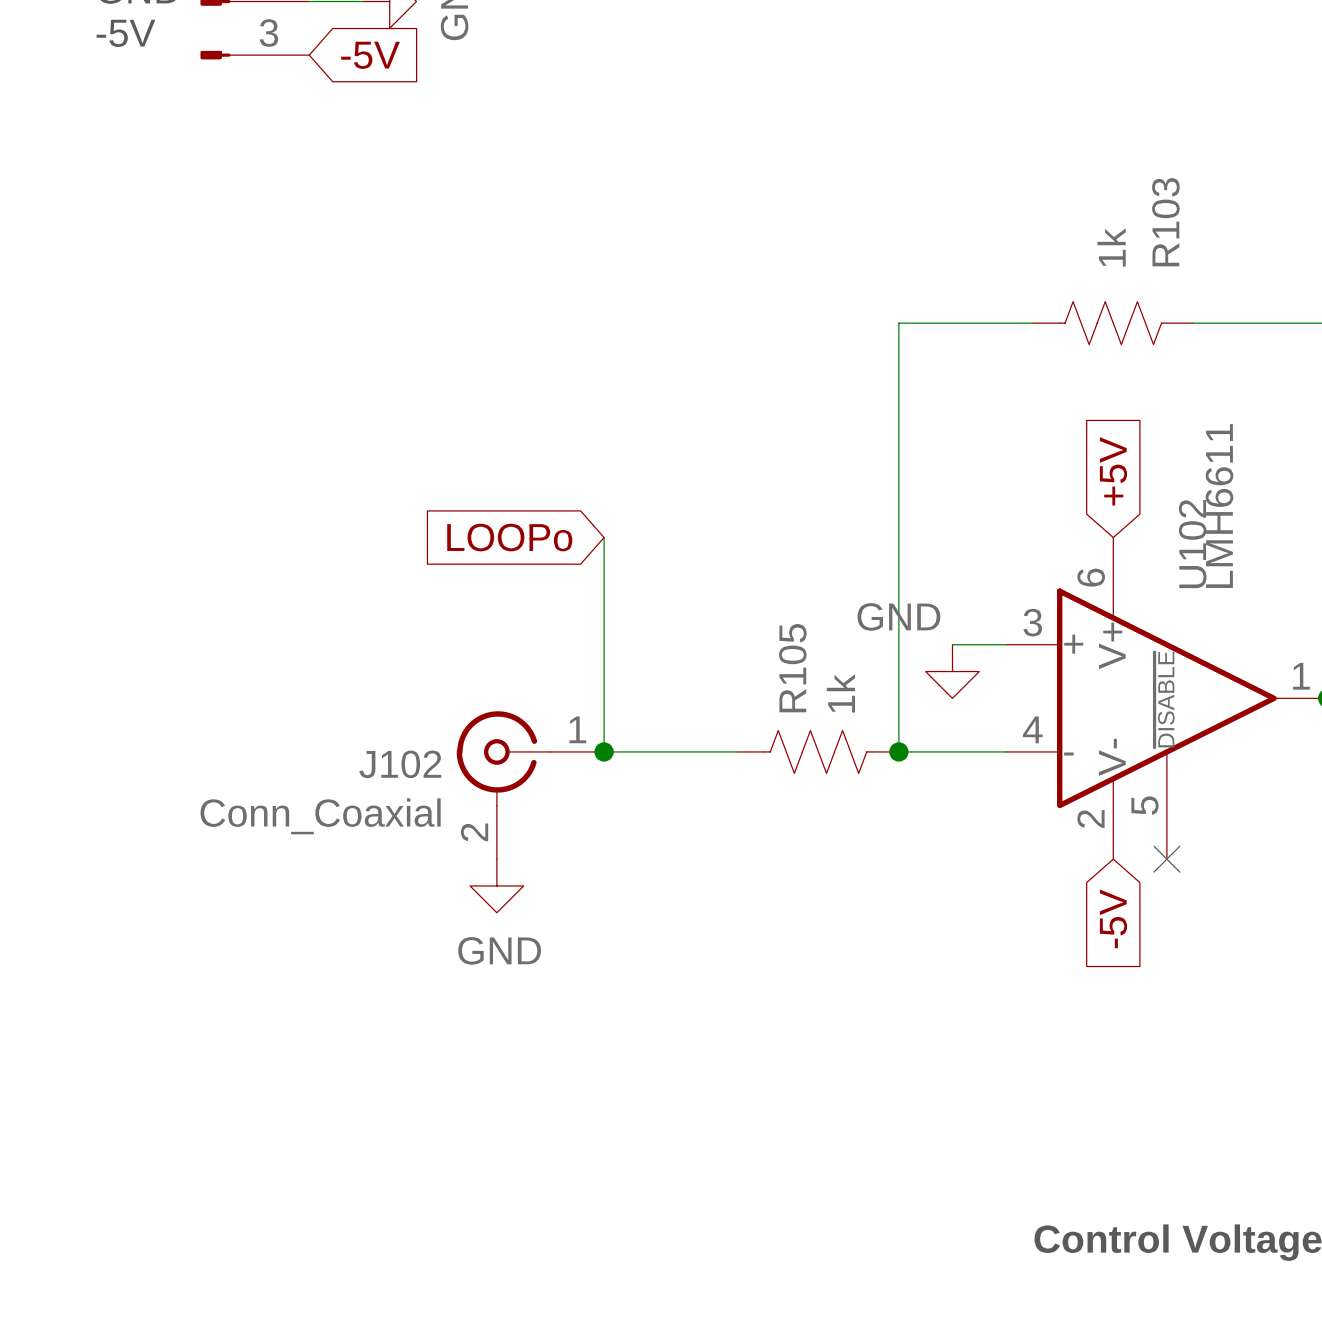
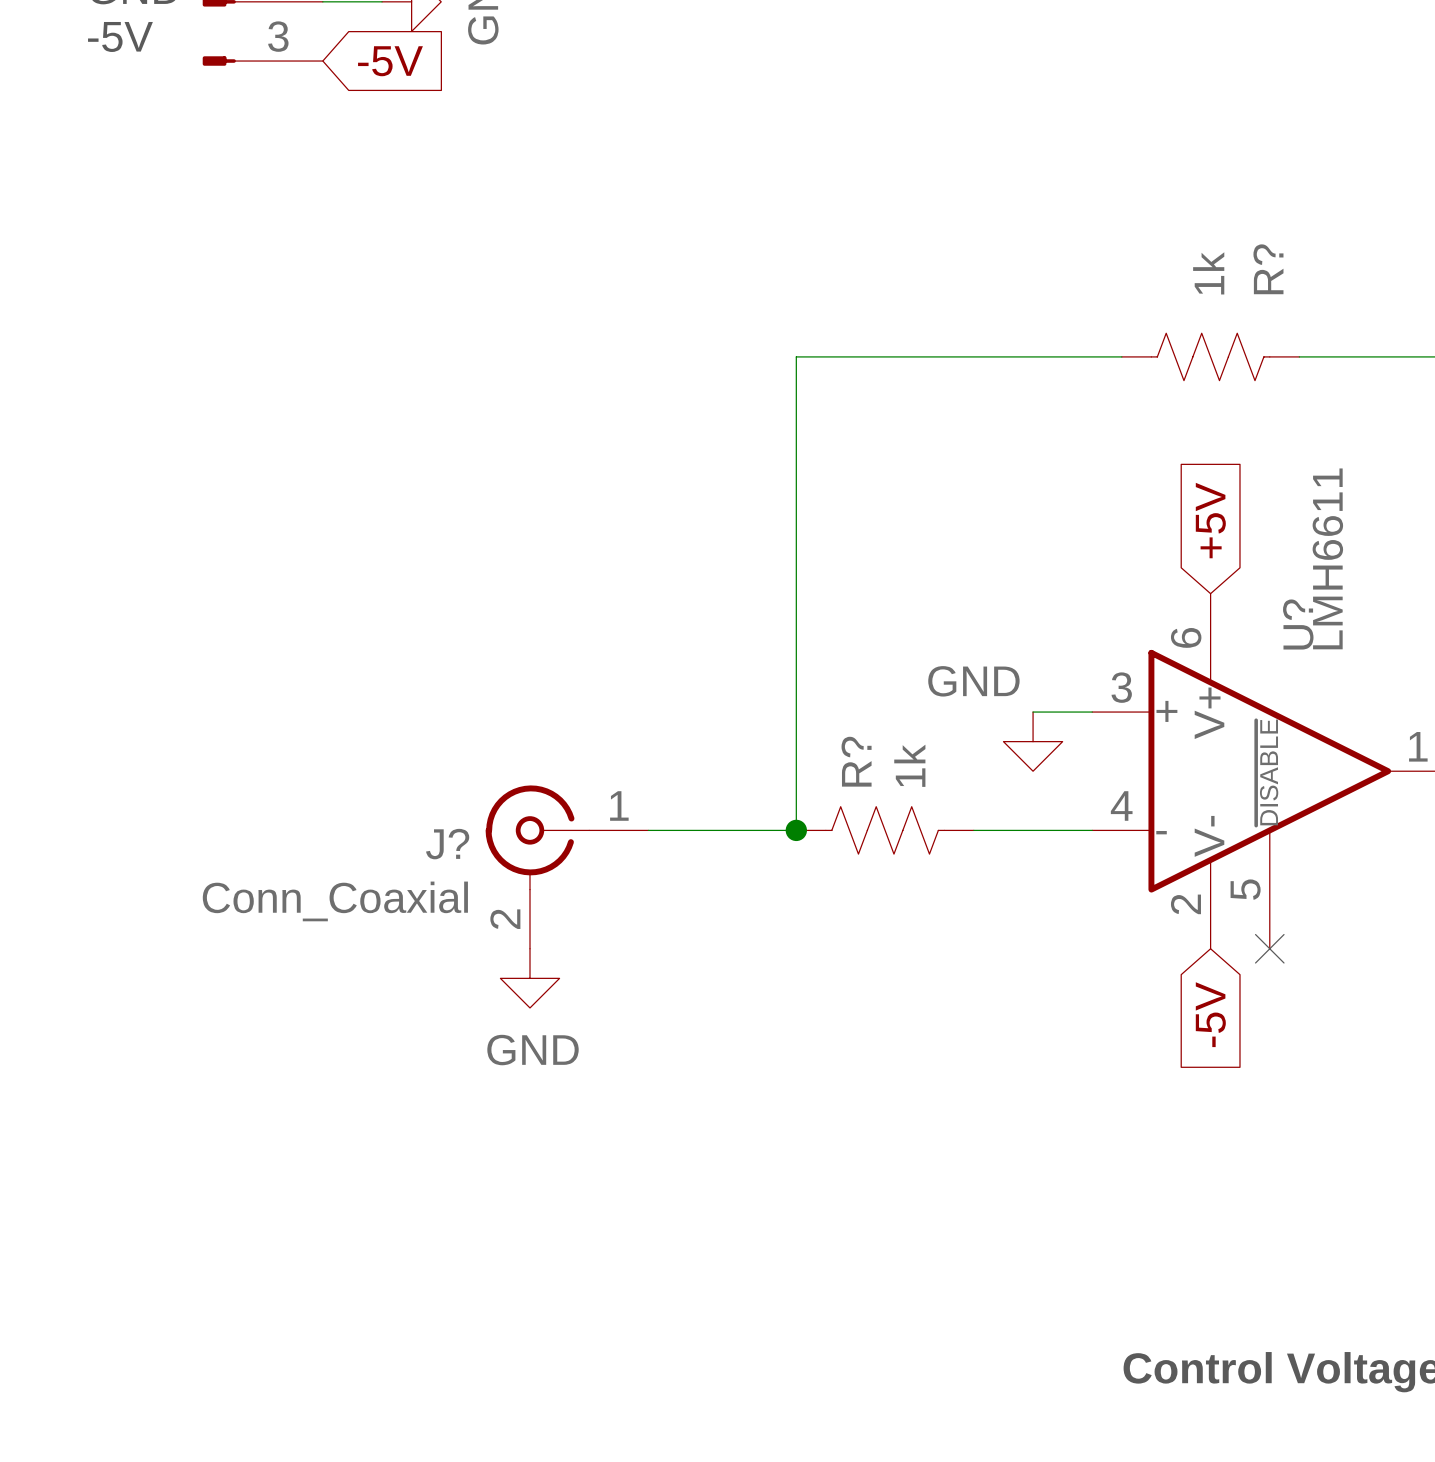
R103 name: R103 (1165, 222) -> R? (1268, 269)
wire: (898, 323) (898, 751) -> (973, 356) (796, 356) (796, 830)
global label: LOOPo (509, 537) -> none
wire: (604, 537) (604, 751) -> none
U102 name: U102 (1192, 544) -> U? (1298, 624)
R105 name: R105 (792, 668) -> R? (856, 761)
junction: (604, 751) -> none
junction: none -> (796, 830)
junction: (898, 751) -> none
J102 name: J102 (400, 764) -> J? (447, 844)

